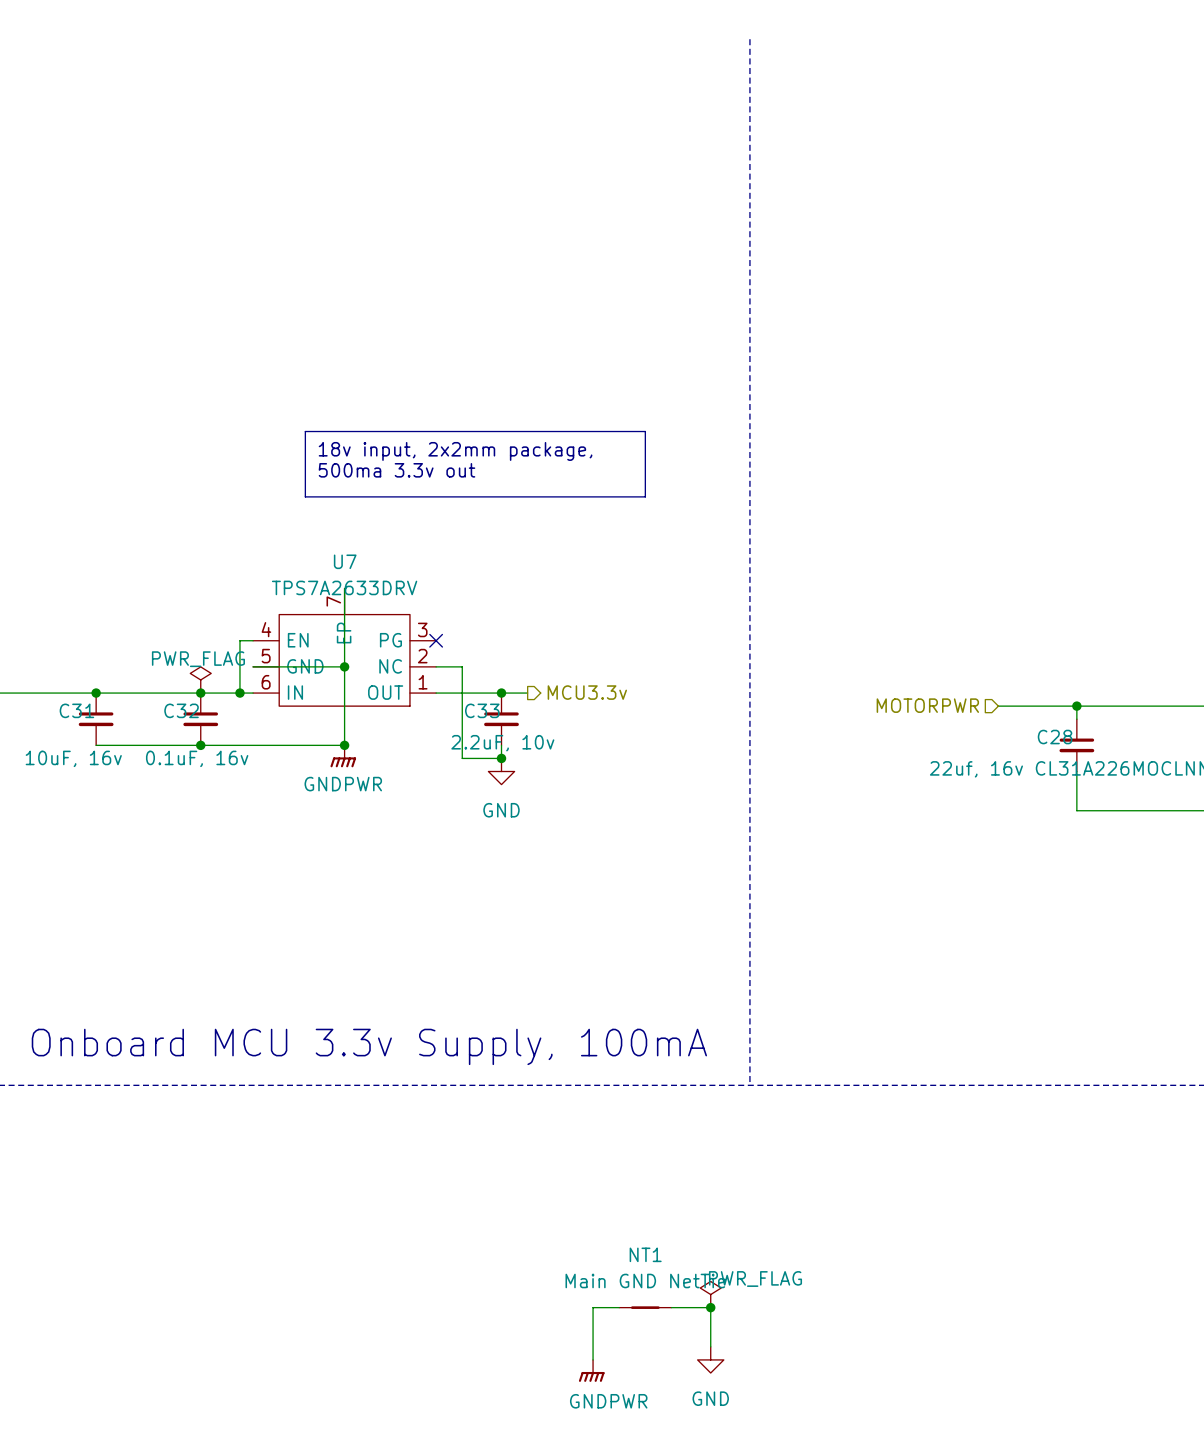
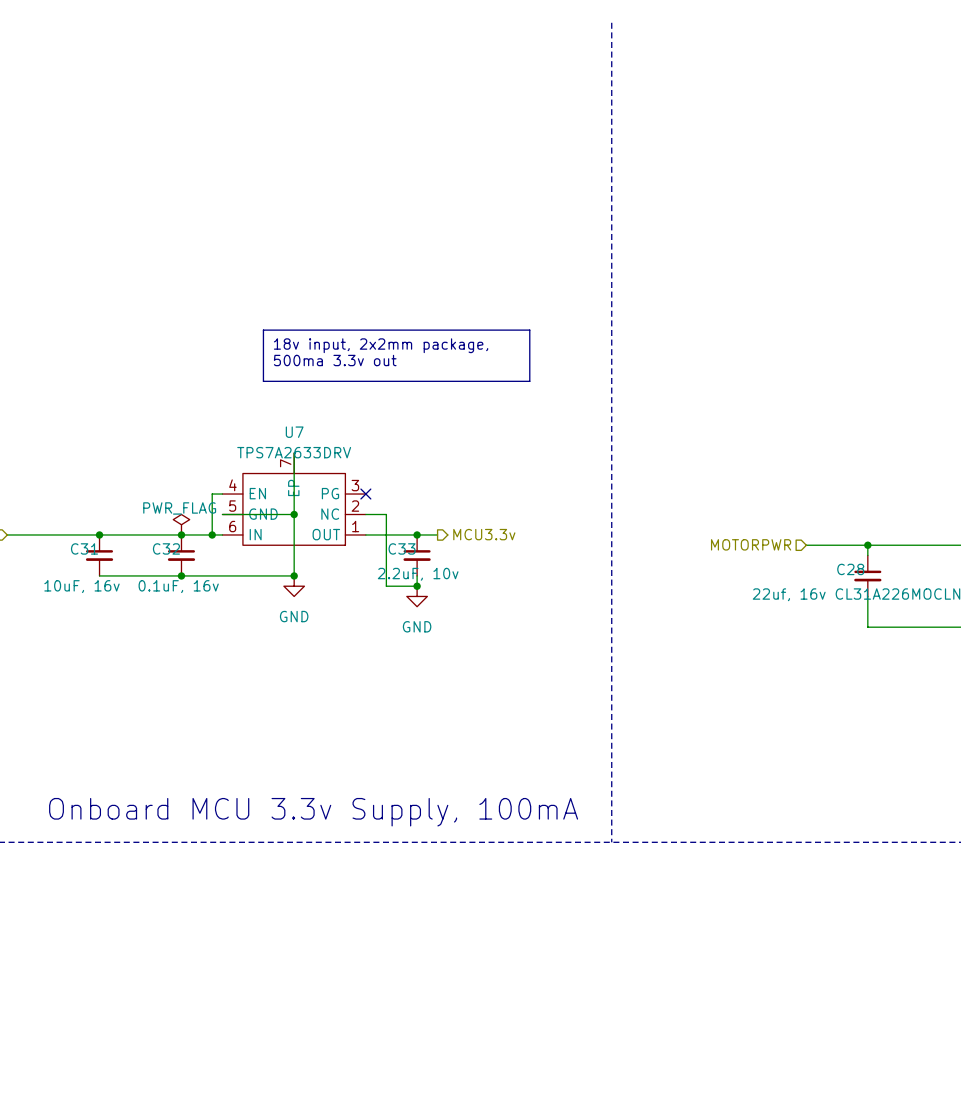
power symbol: GNDPWR (343, 756) -> GND (294, 586)
power symbol: PWR_FLAG (710, 1294) -> none
wire: (619, 1307) (593, 1307) (593, 1359) -> none
NT1: Main GND NetTie (645, 1307) -> none
wire: (671, 1307) (710, 1307) (710, 1346) -> none
junction: (710, 1307) -> none
power symbol: GND (710, 1359) -> none
power symbol: GNDPWR (591, 1370) -> none

